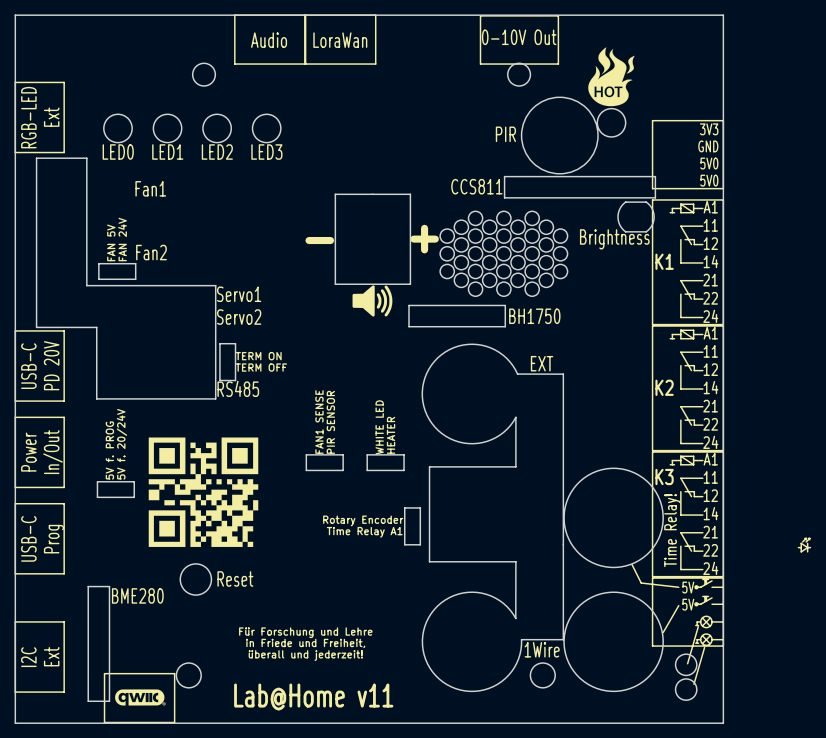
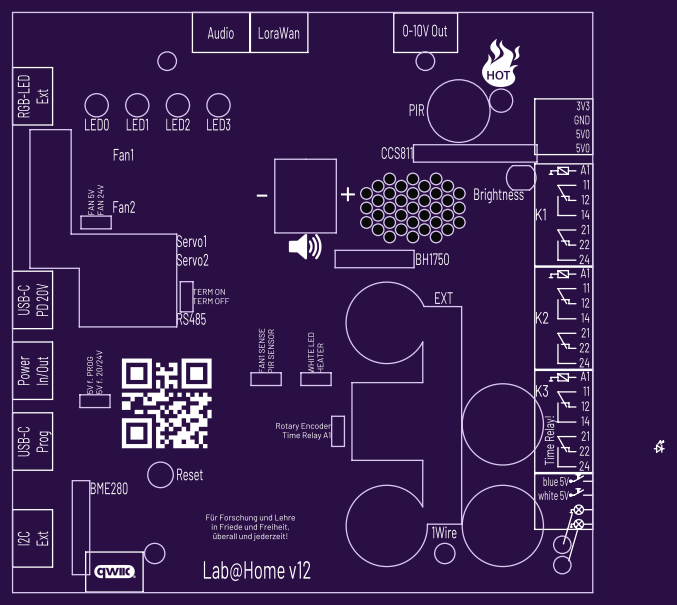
line: (632, 564) (641, 583) (678, 587) -> none
text: 5V (688, 587) -> blue 5V (556, 481)
text: 5V (688, 604) -> white 5V (553, 495)
line: (678, 605) (663, 632) -> none
text: Lab@Home v11 (313, 697) -> Lab@Home v12 (257, 571)

